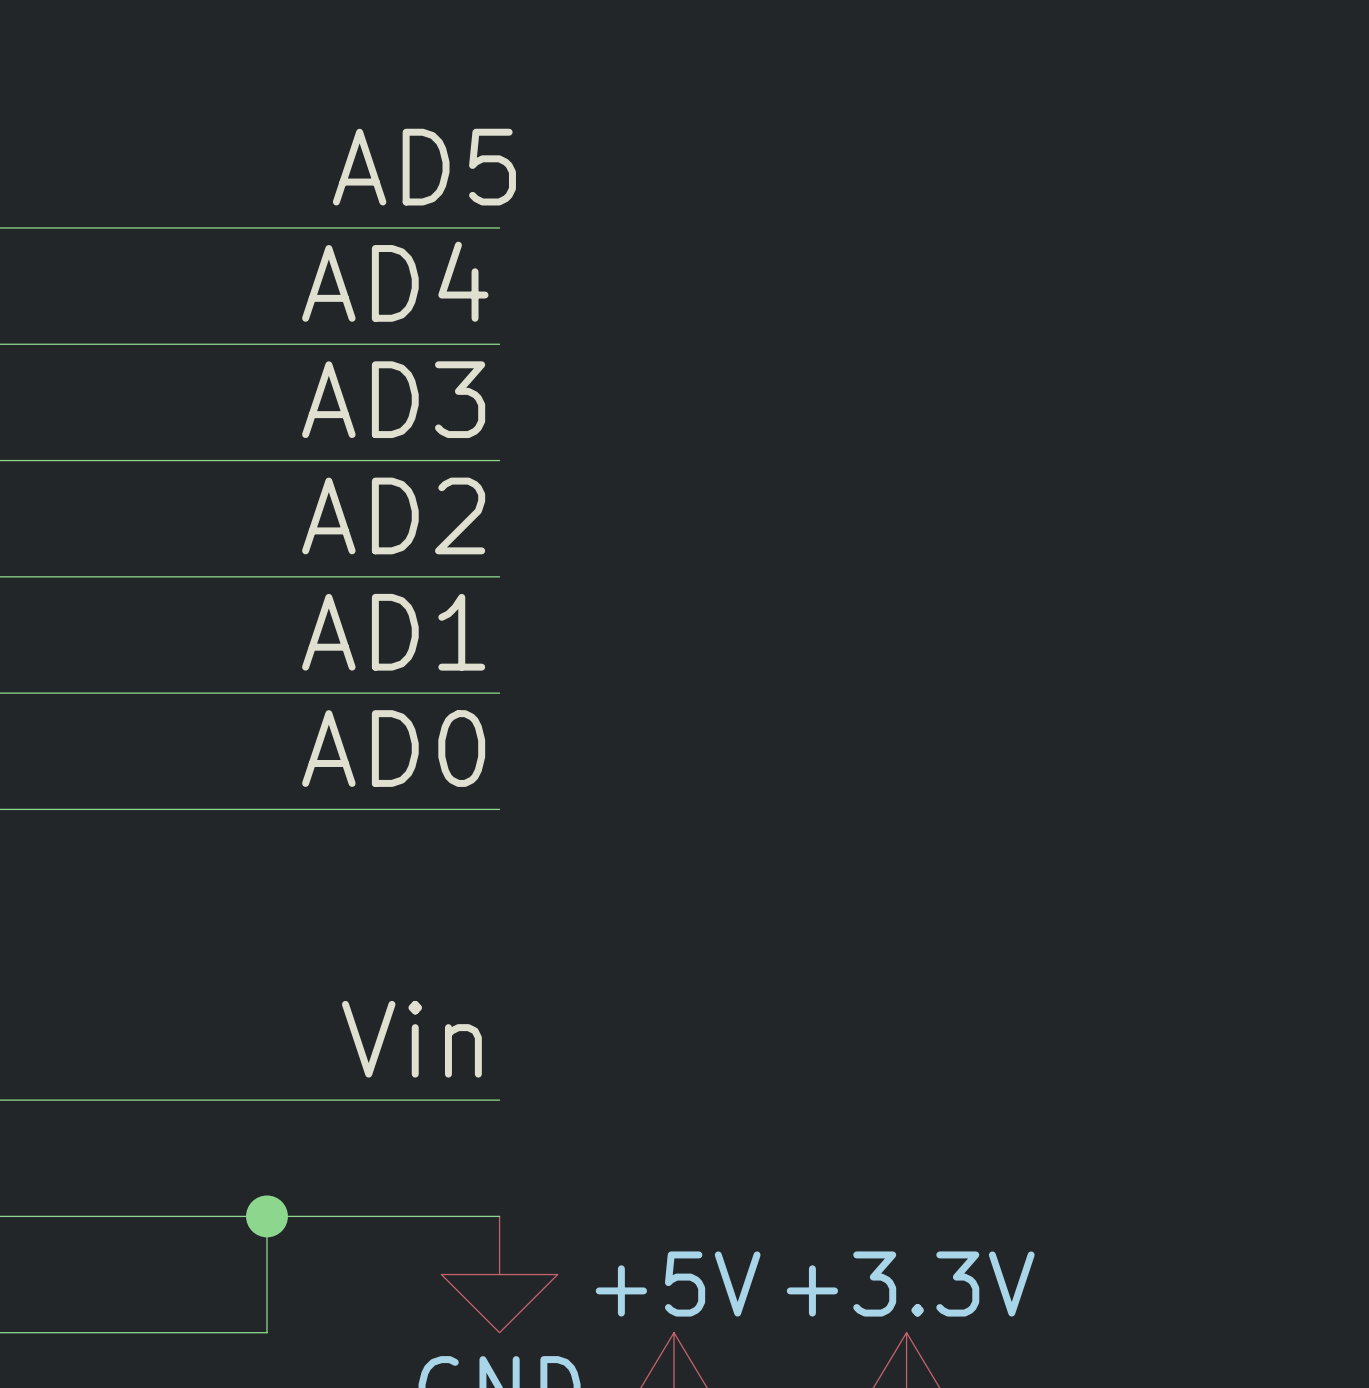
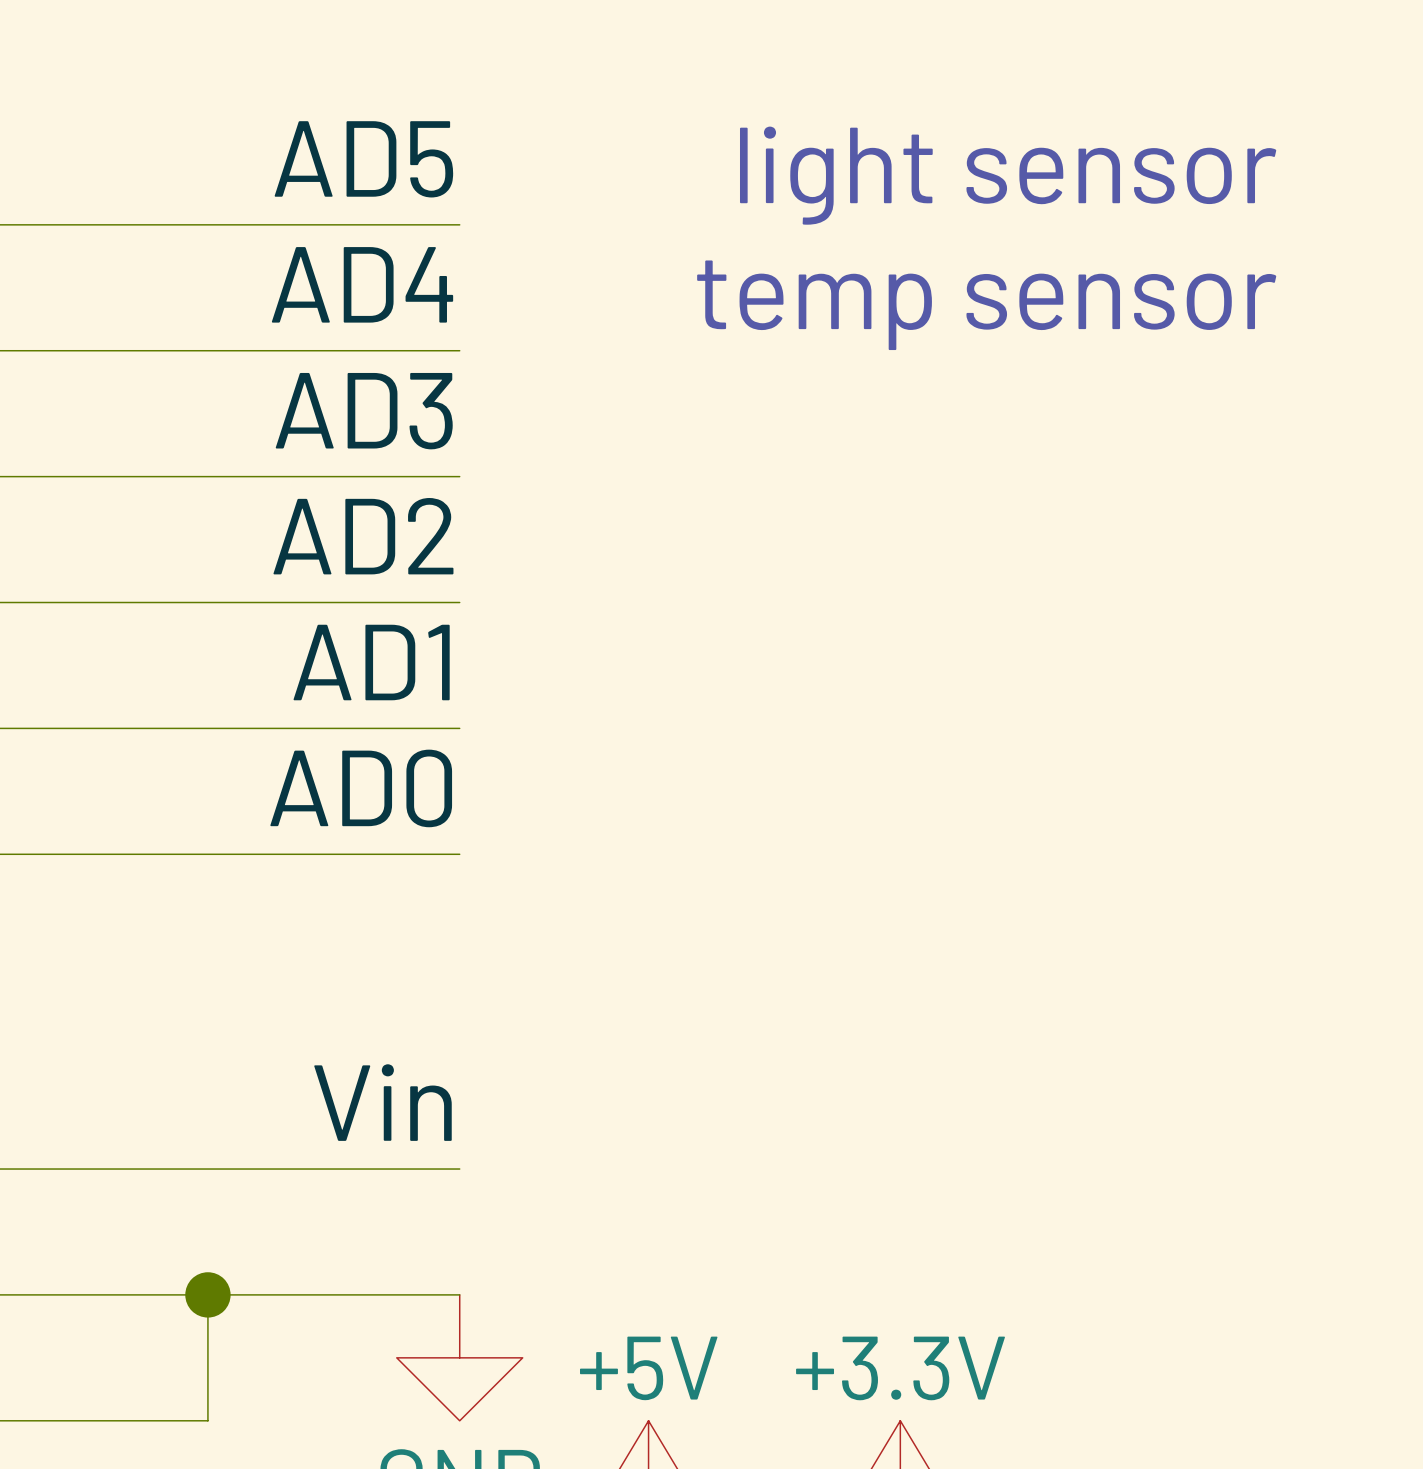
text: none -> light sensor (1008, 175)
text: none -> temp sensor (986, 305)

